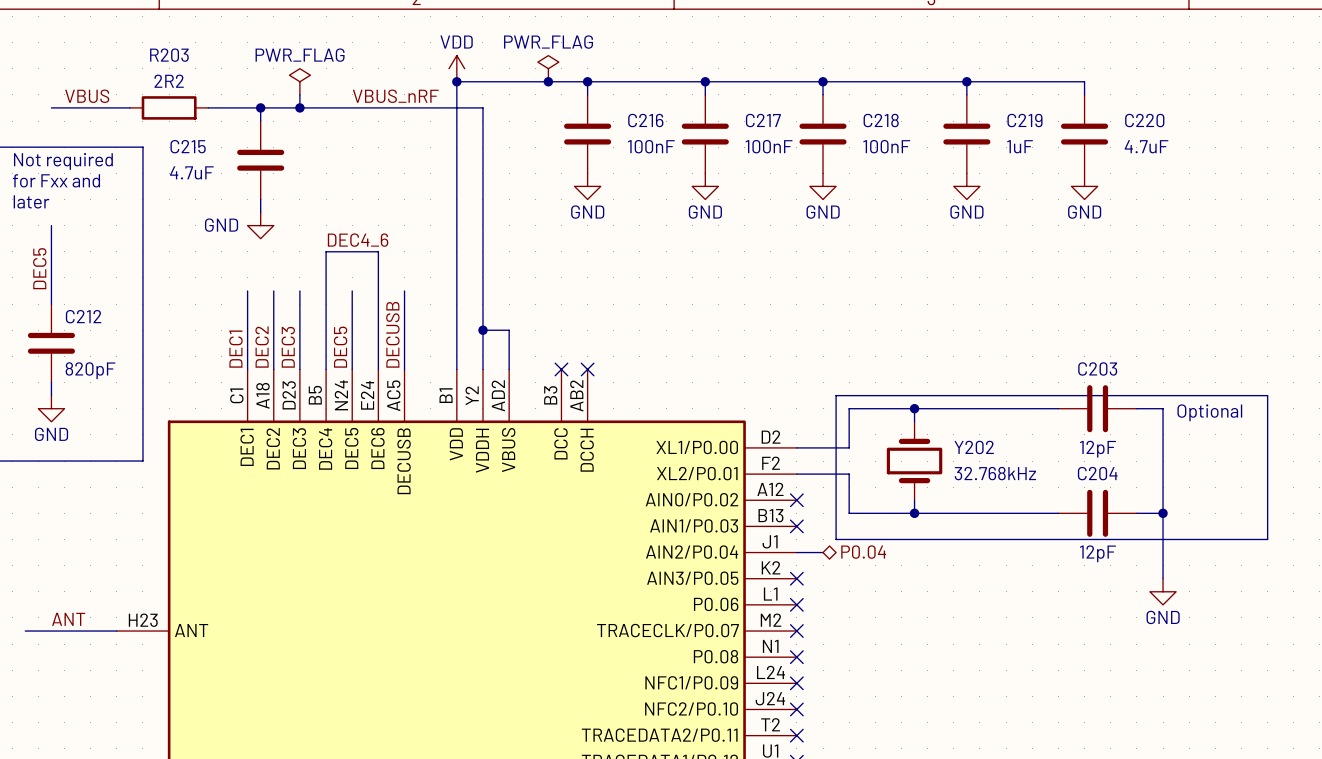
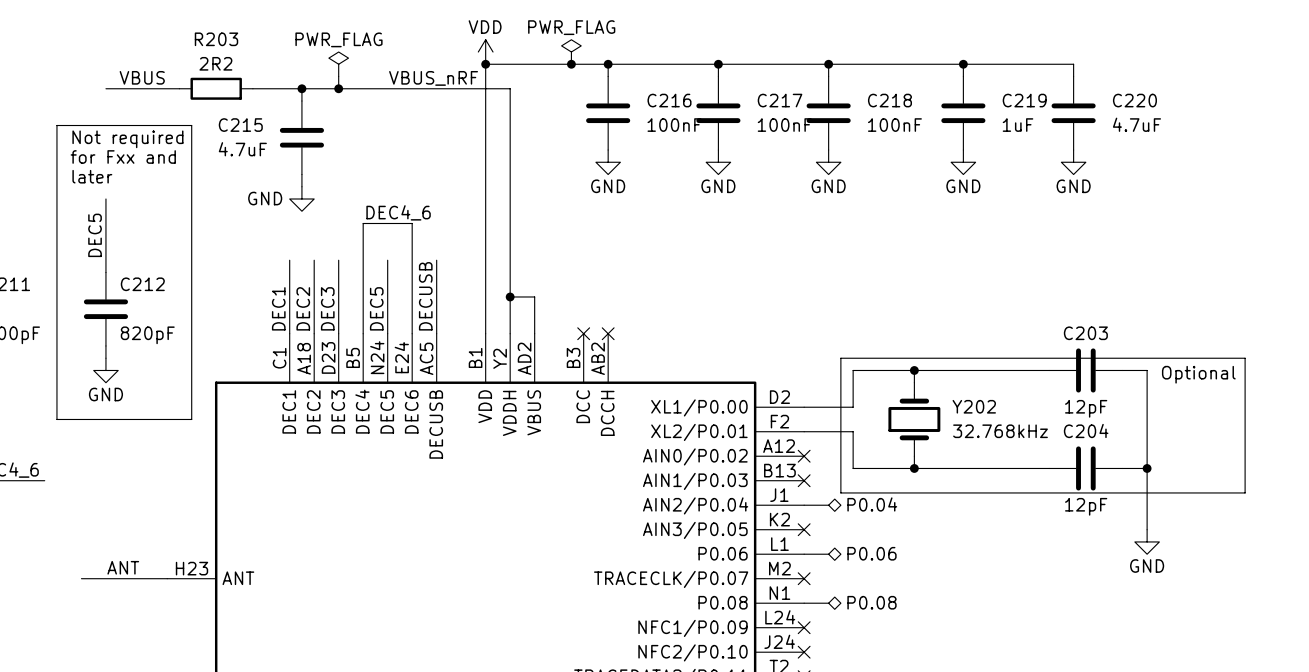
wire: none -> (804, 554) (828, 554)
no-connect mark: (796, 604) -> none
hierarchical label: none -> P0.06 (871, 553)
hierarchical label: none -> P0.08 (871, 602)
wire: none -> (804, 603) (828, 603)
no-connect mark: (796, 657) -> none

